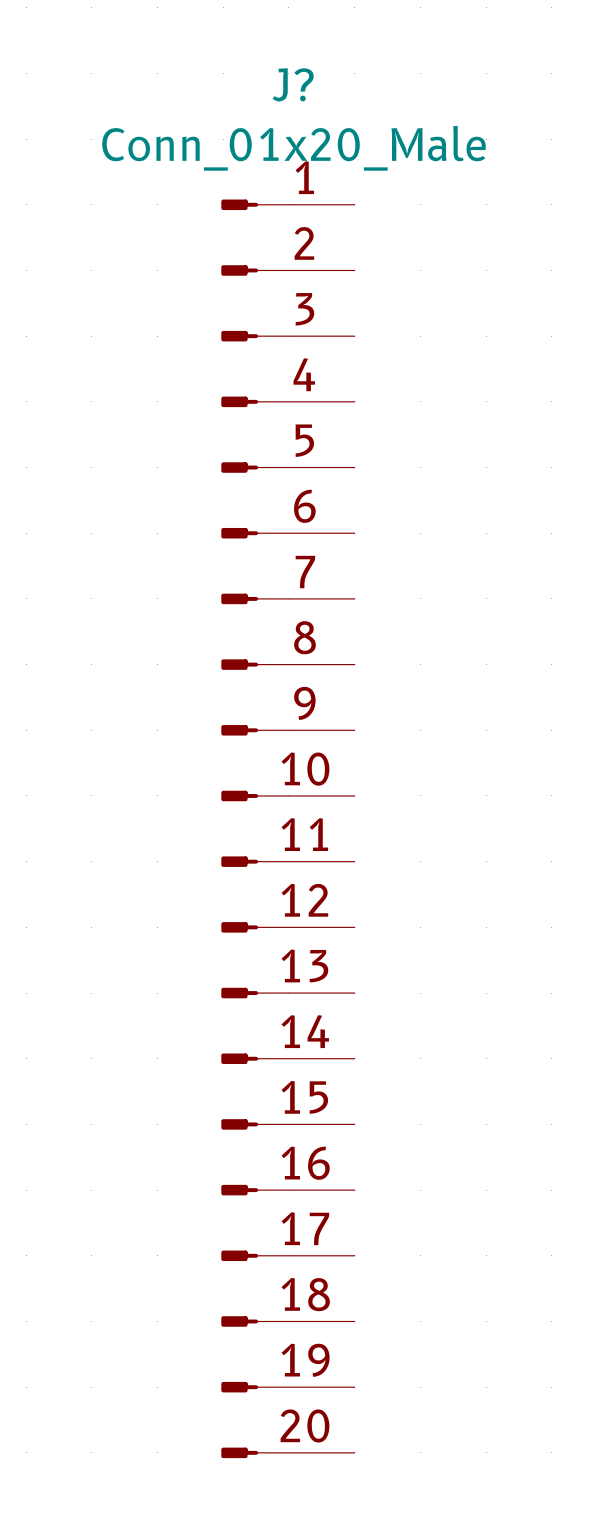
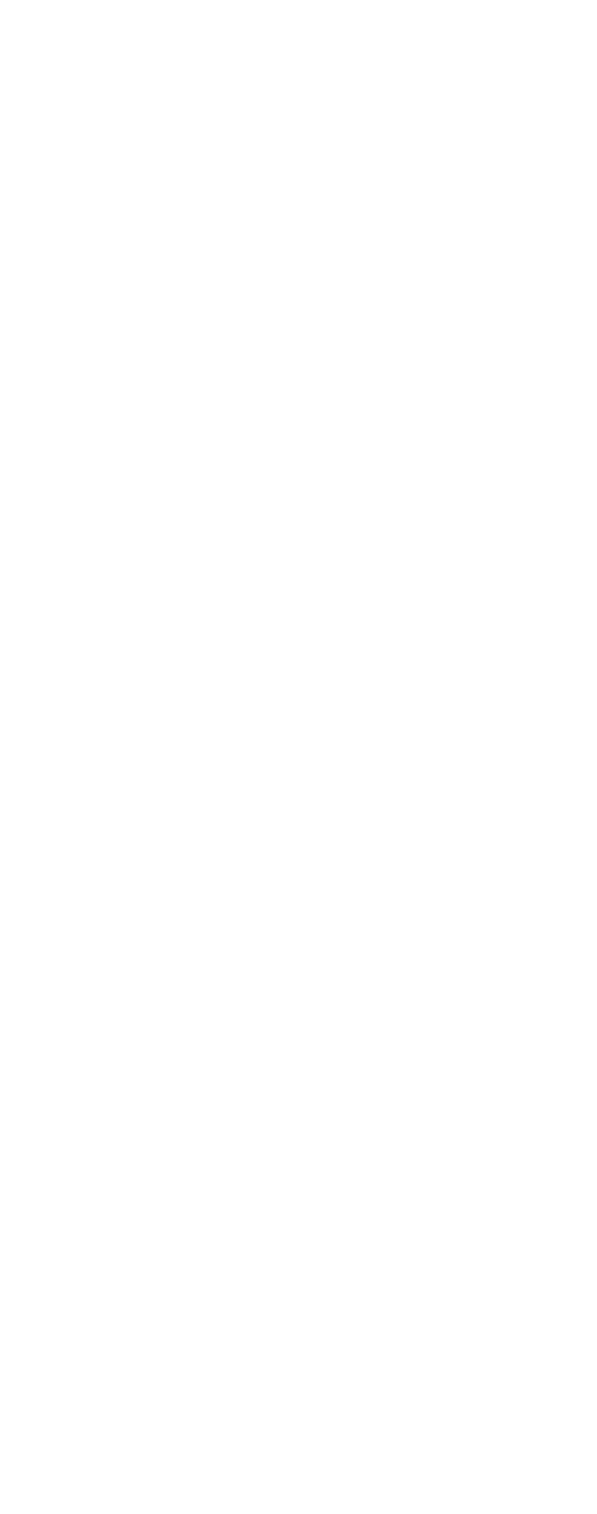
J?: Conn_01x20_Male (287, 828) -> none

